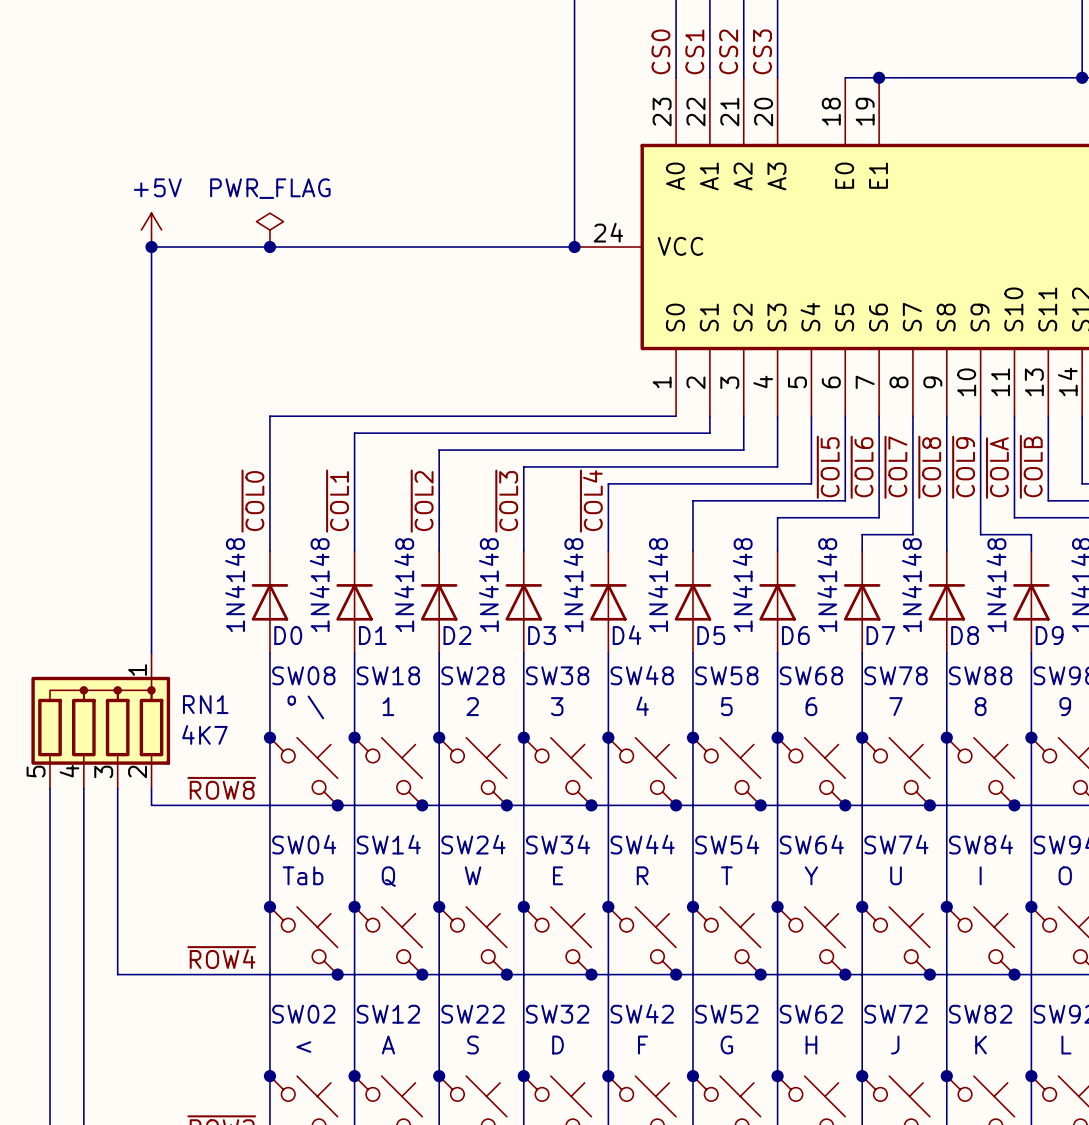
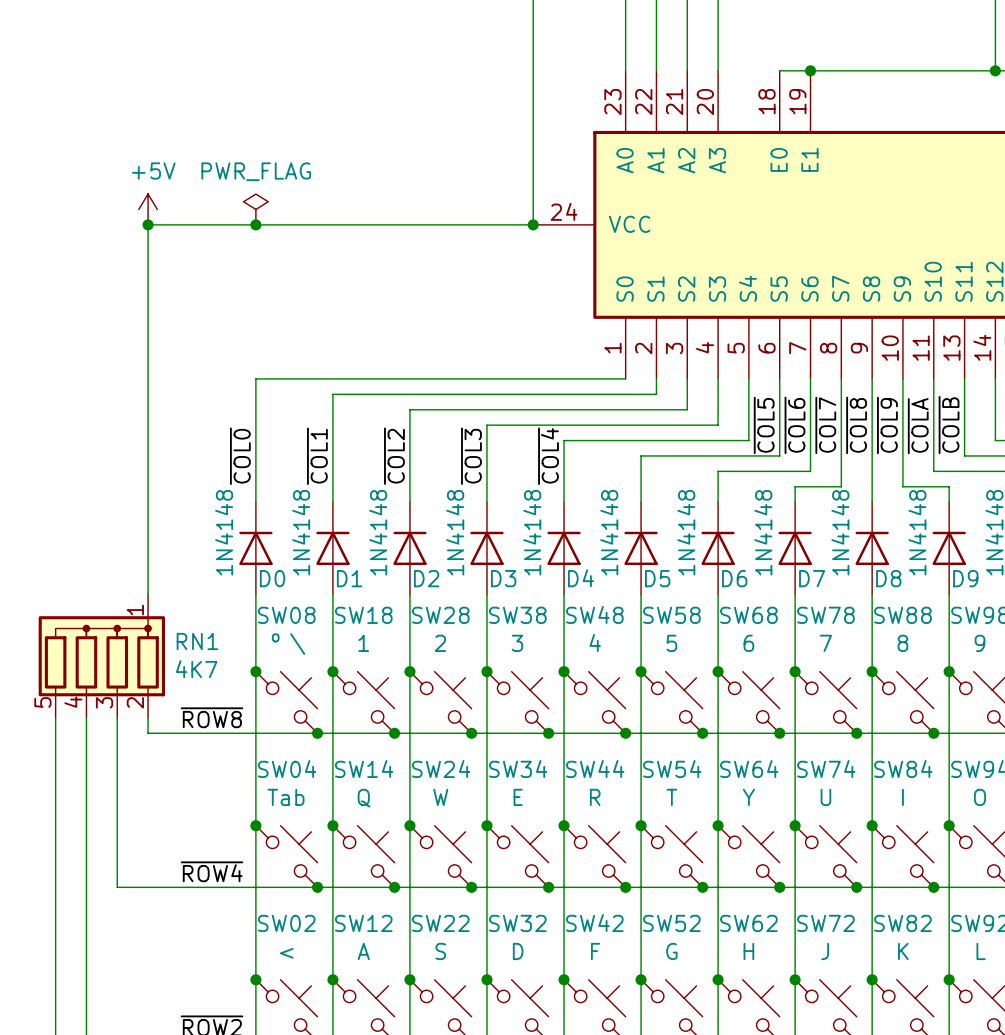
label: CS0 (660, 51) -> none
label: CS1 (694, 51) -> none
label: CS2 (728, 51) -> none
label: CS3 (762, 51) -> none

